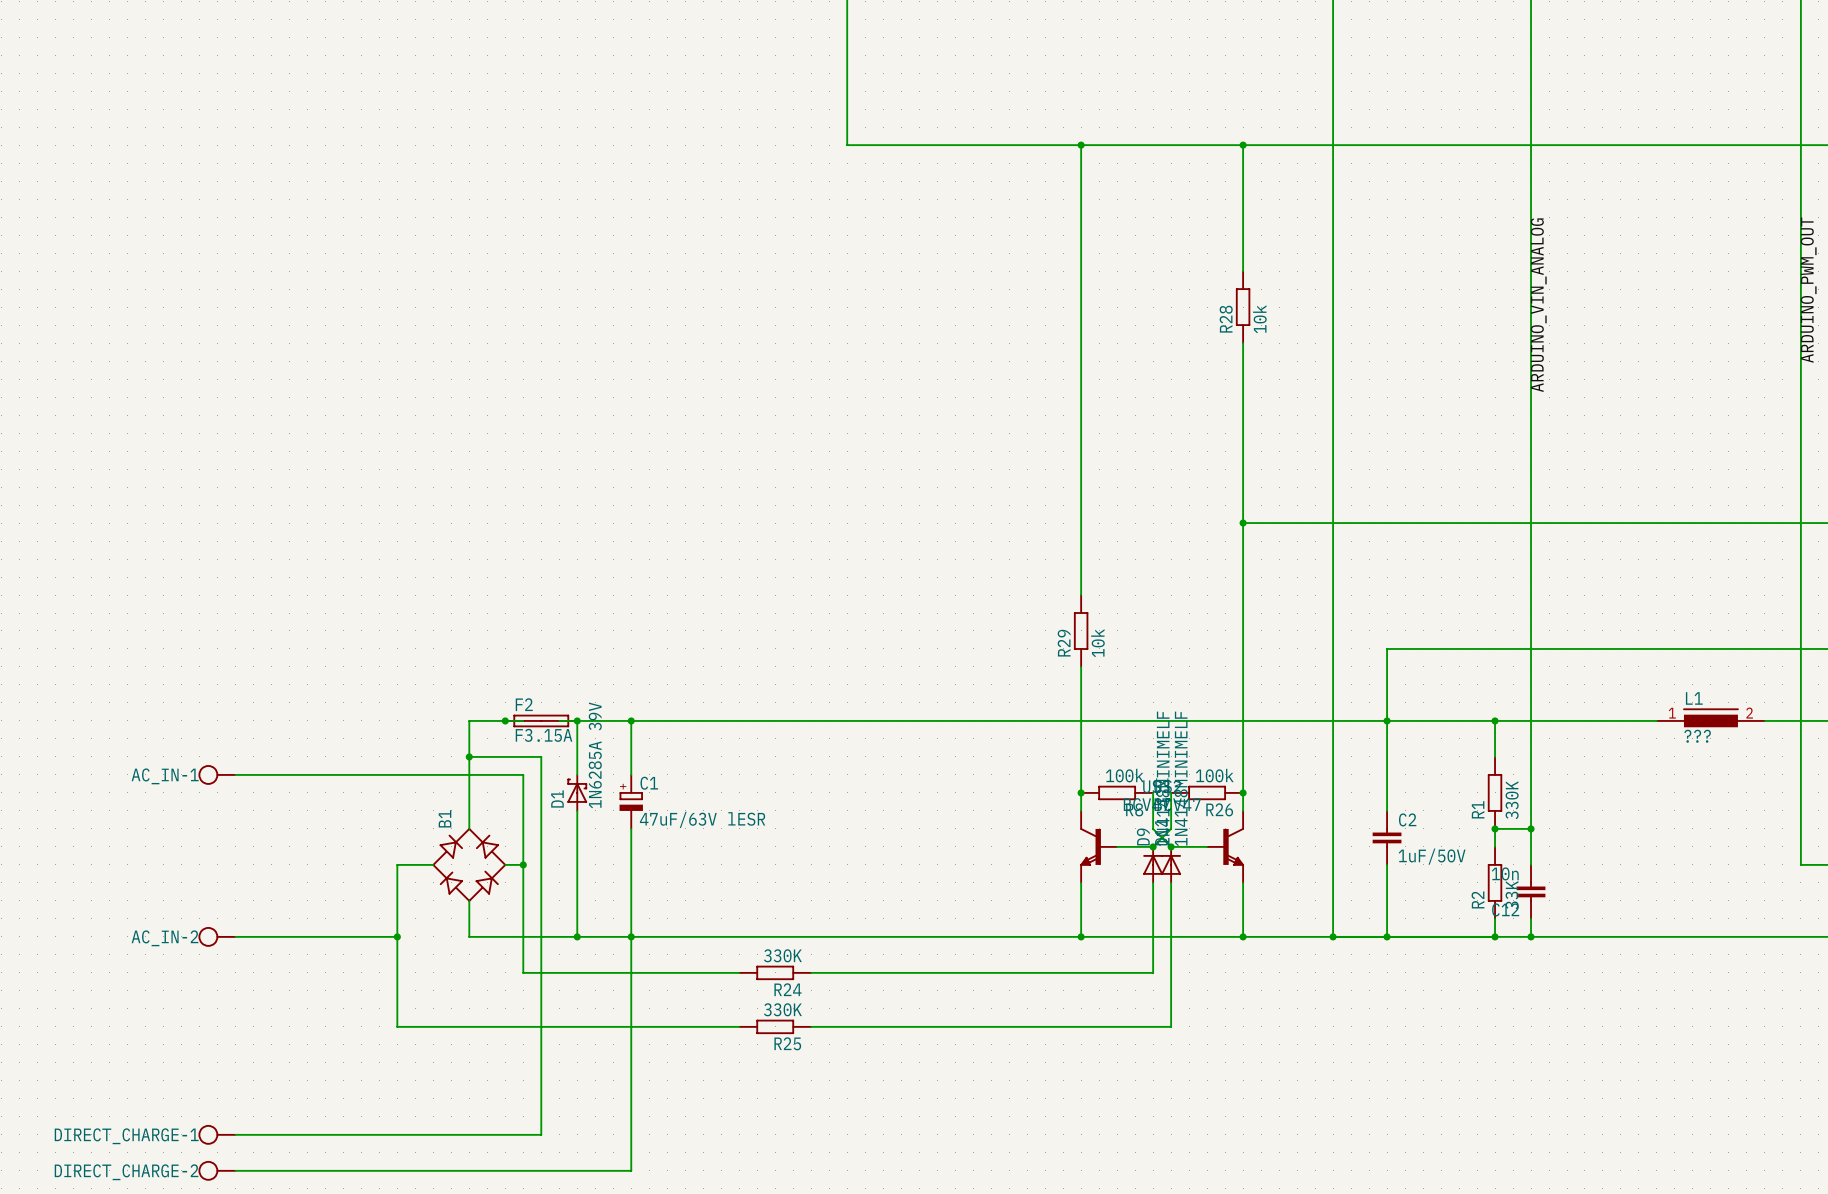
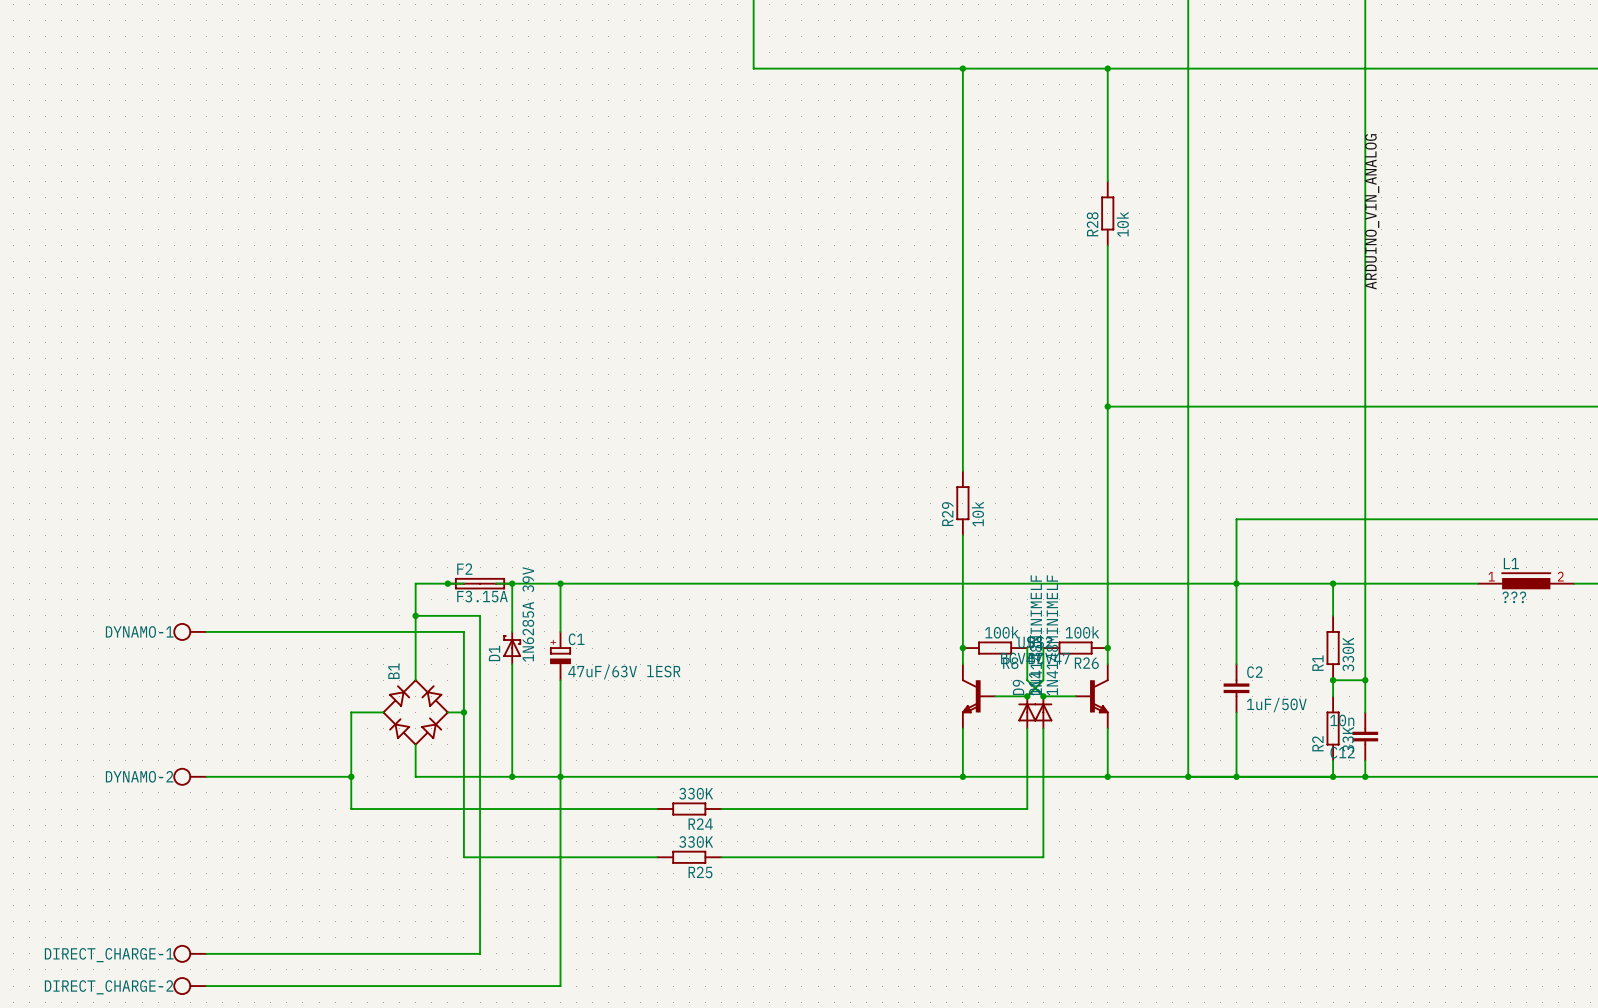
AC_IN-1 name: AC_IN-1 (165, 776) -> DYNAMO-1 (139, 631)
AC_IN-2 name: AC_IN-2 (165, 938) -> DYNAMO-2 (139, 776)
wire: (397, 972) (397, 1026) (523, 1026) -> (351, 809) (463, 809) (463, 857)

